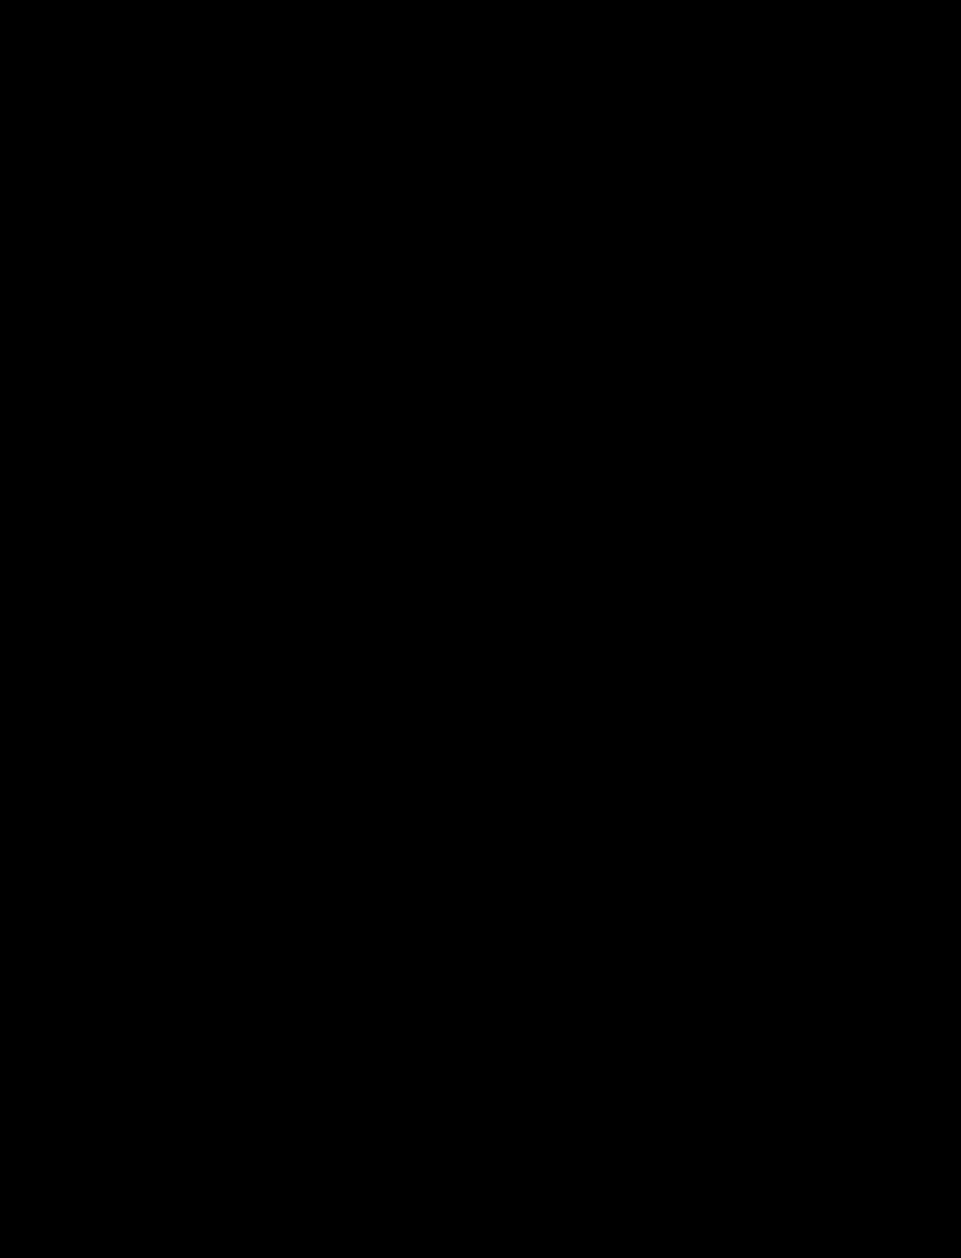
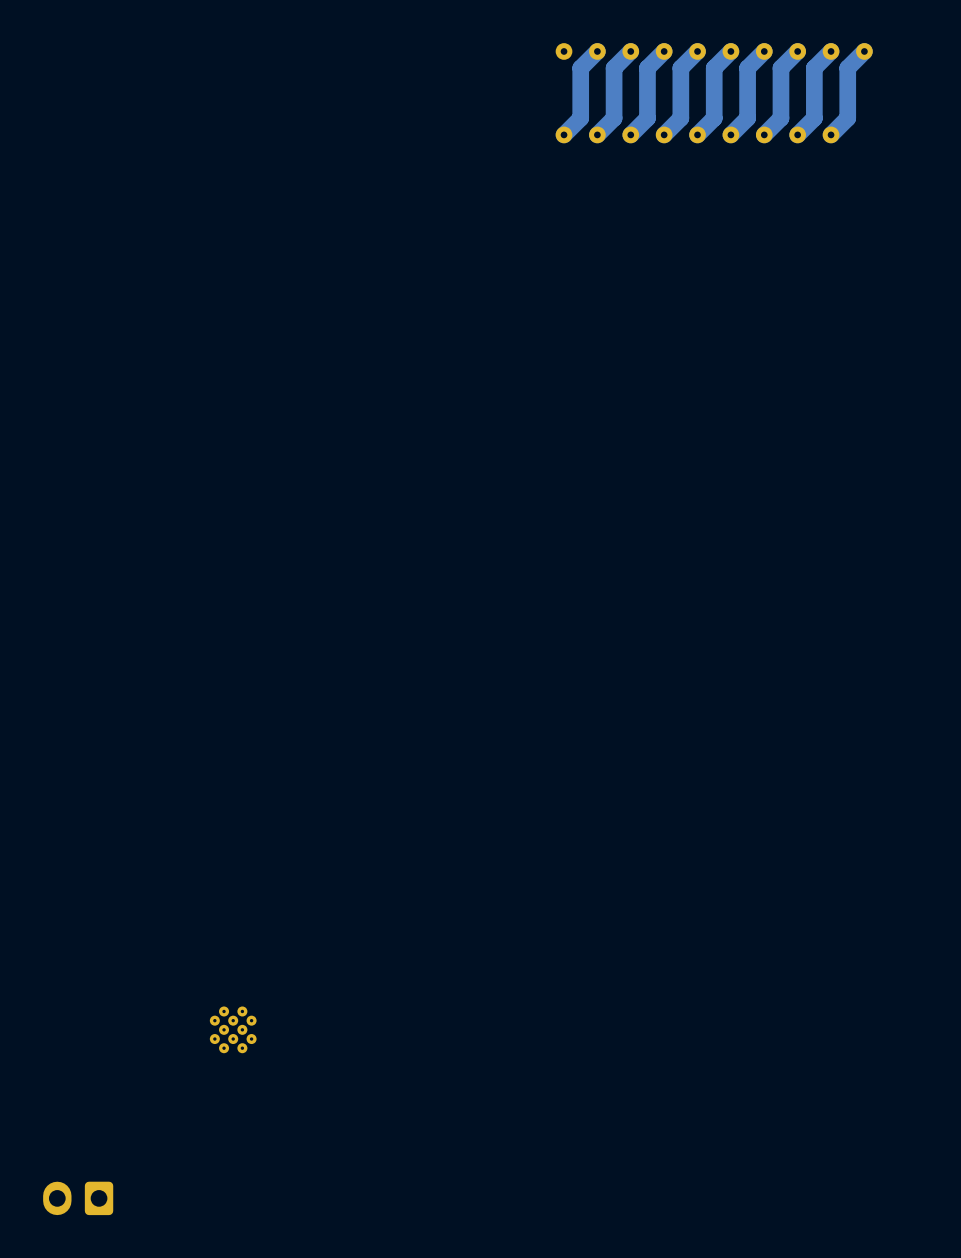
part: none -> (714, 93)
part: none -> (233, 1029)
part: none -> (78, 1198)

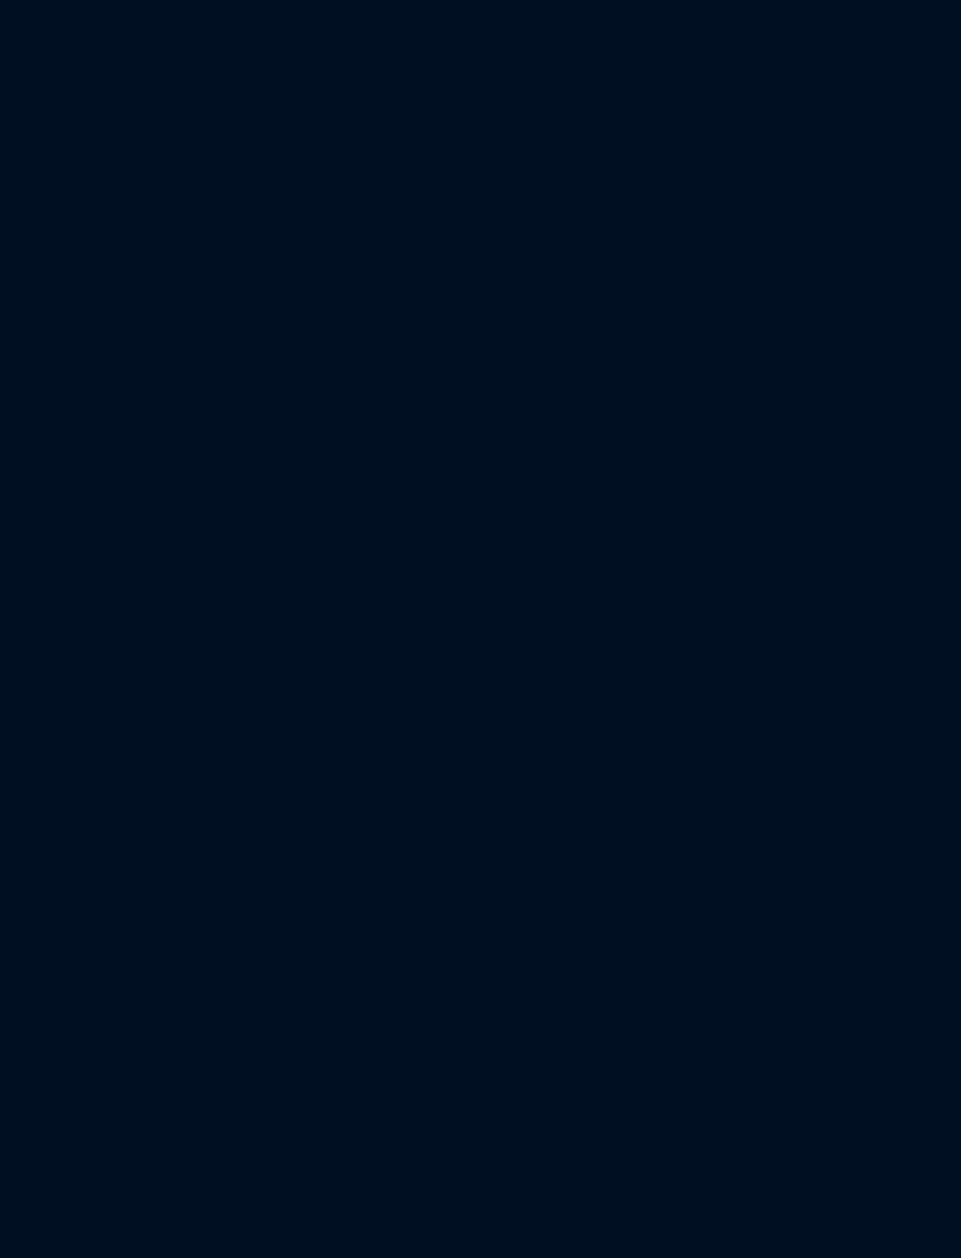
part: (714, 93) -> none
part: (233, 1029) -> none
part: (78, 1198) -> none

